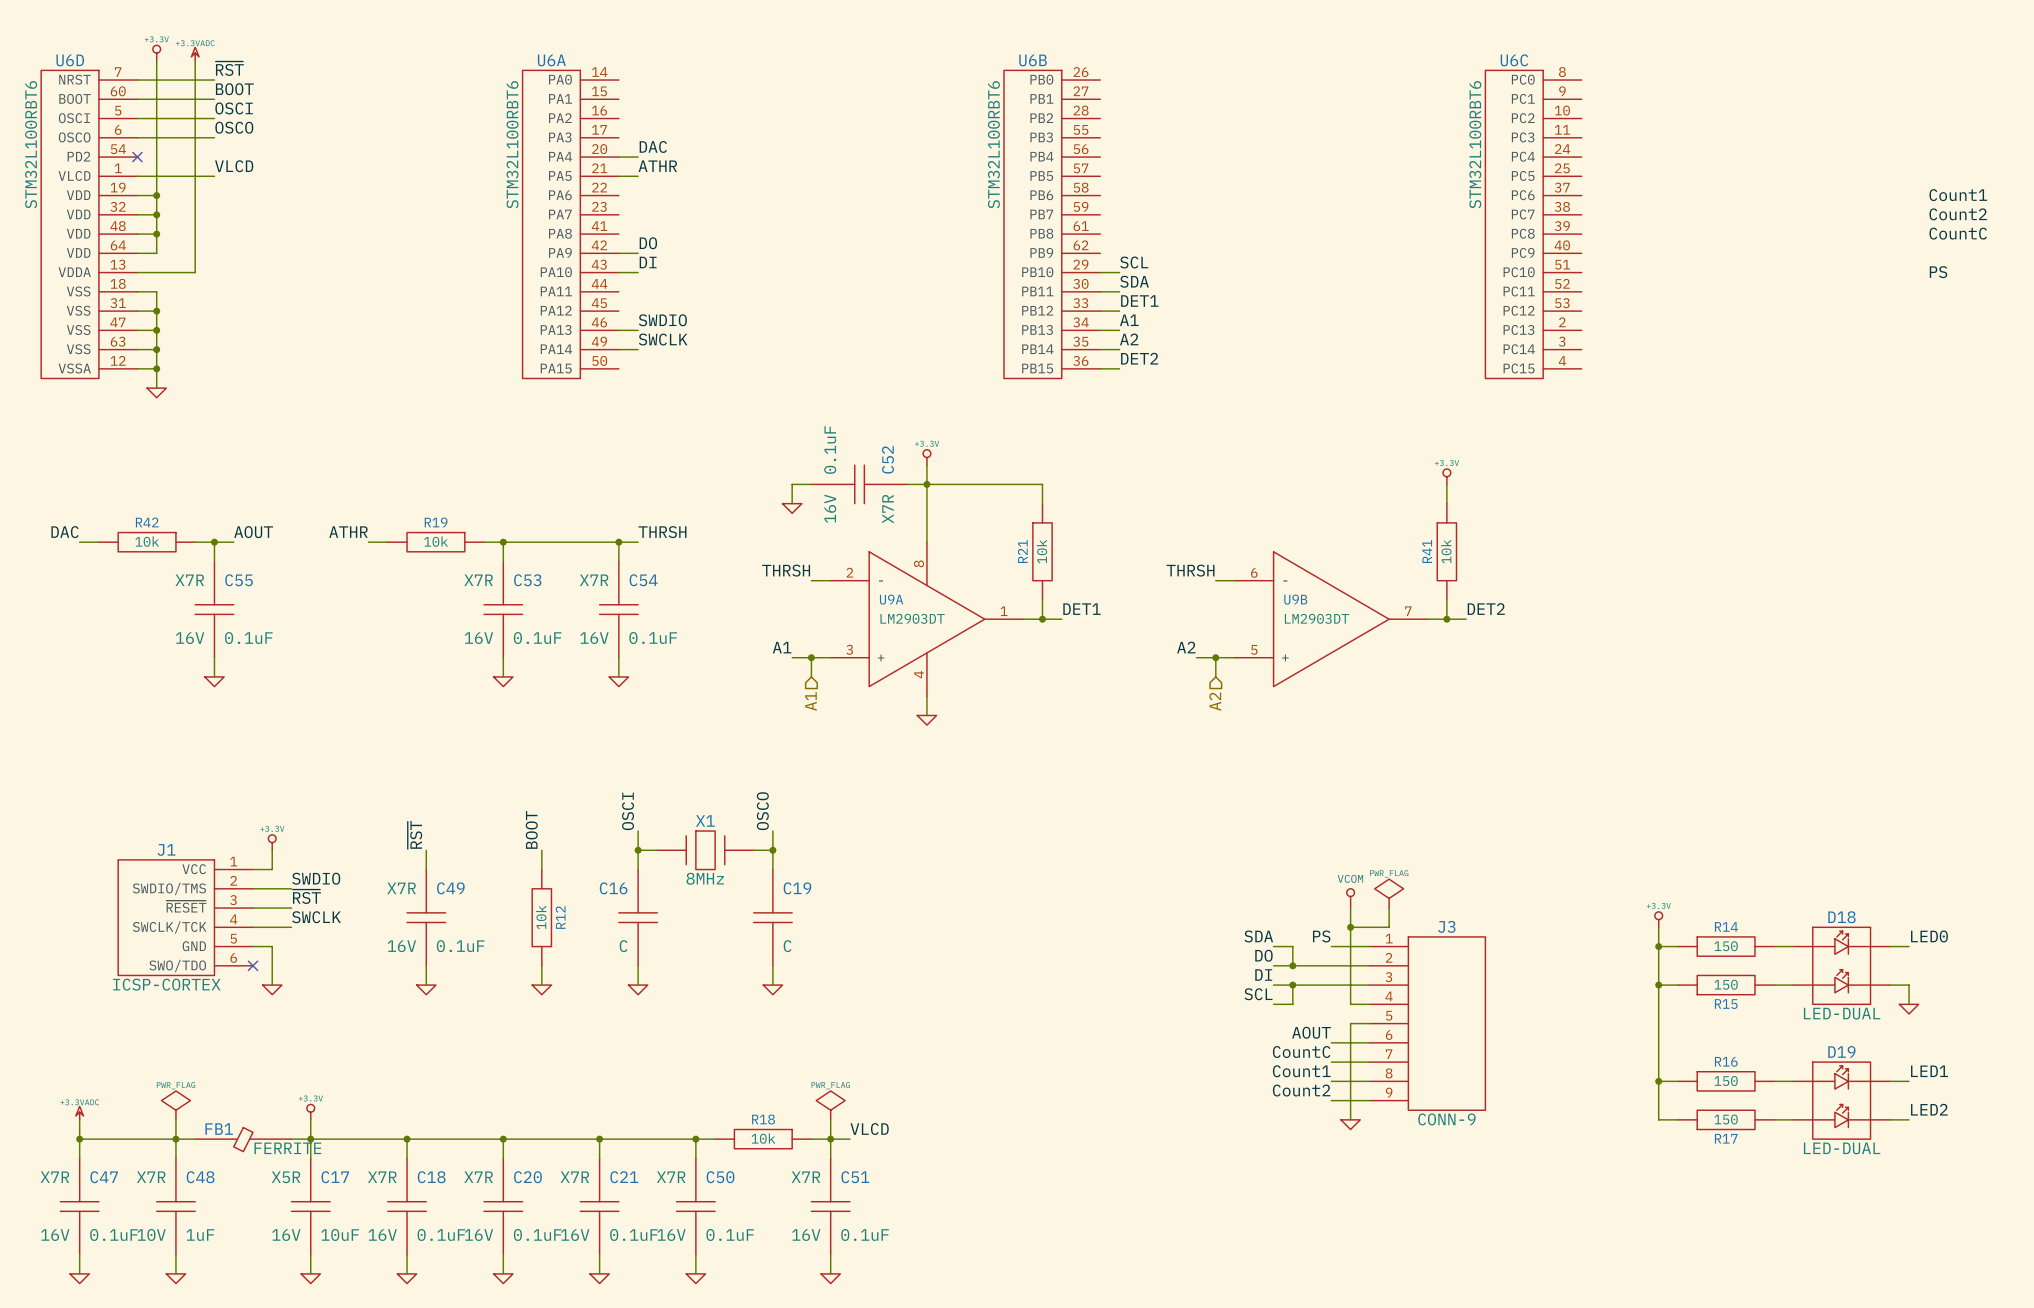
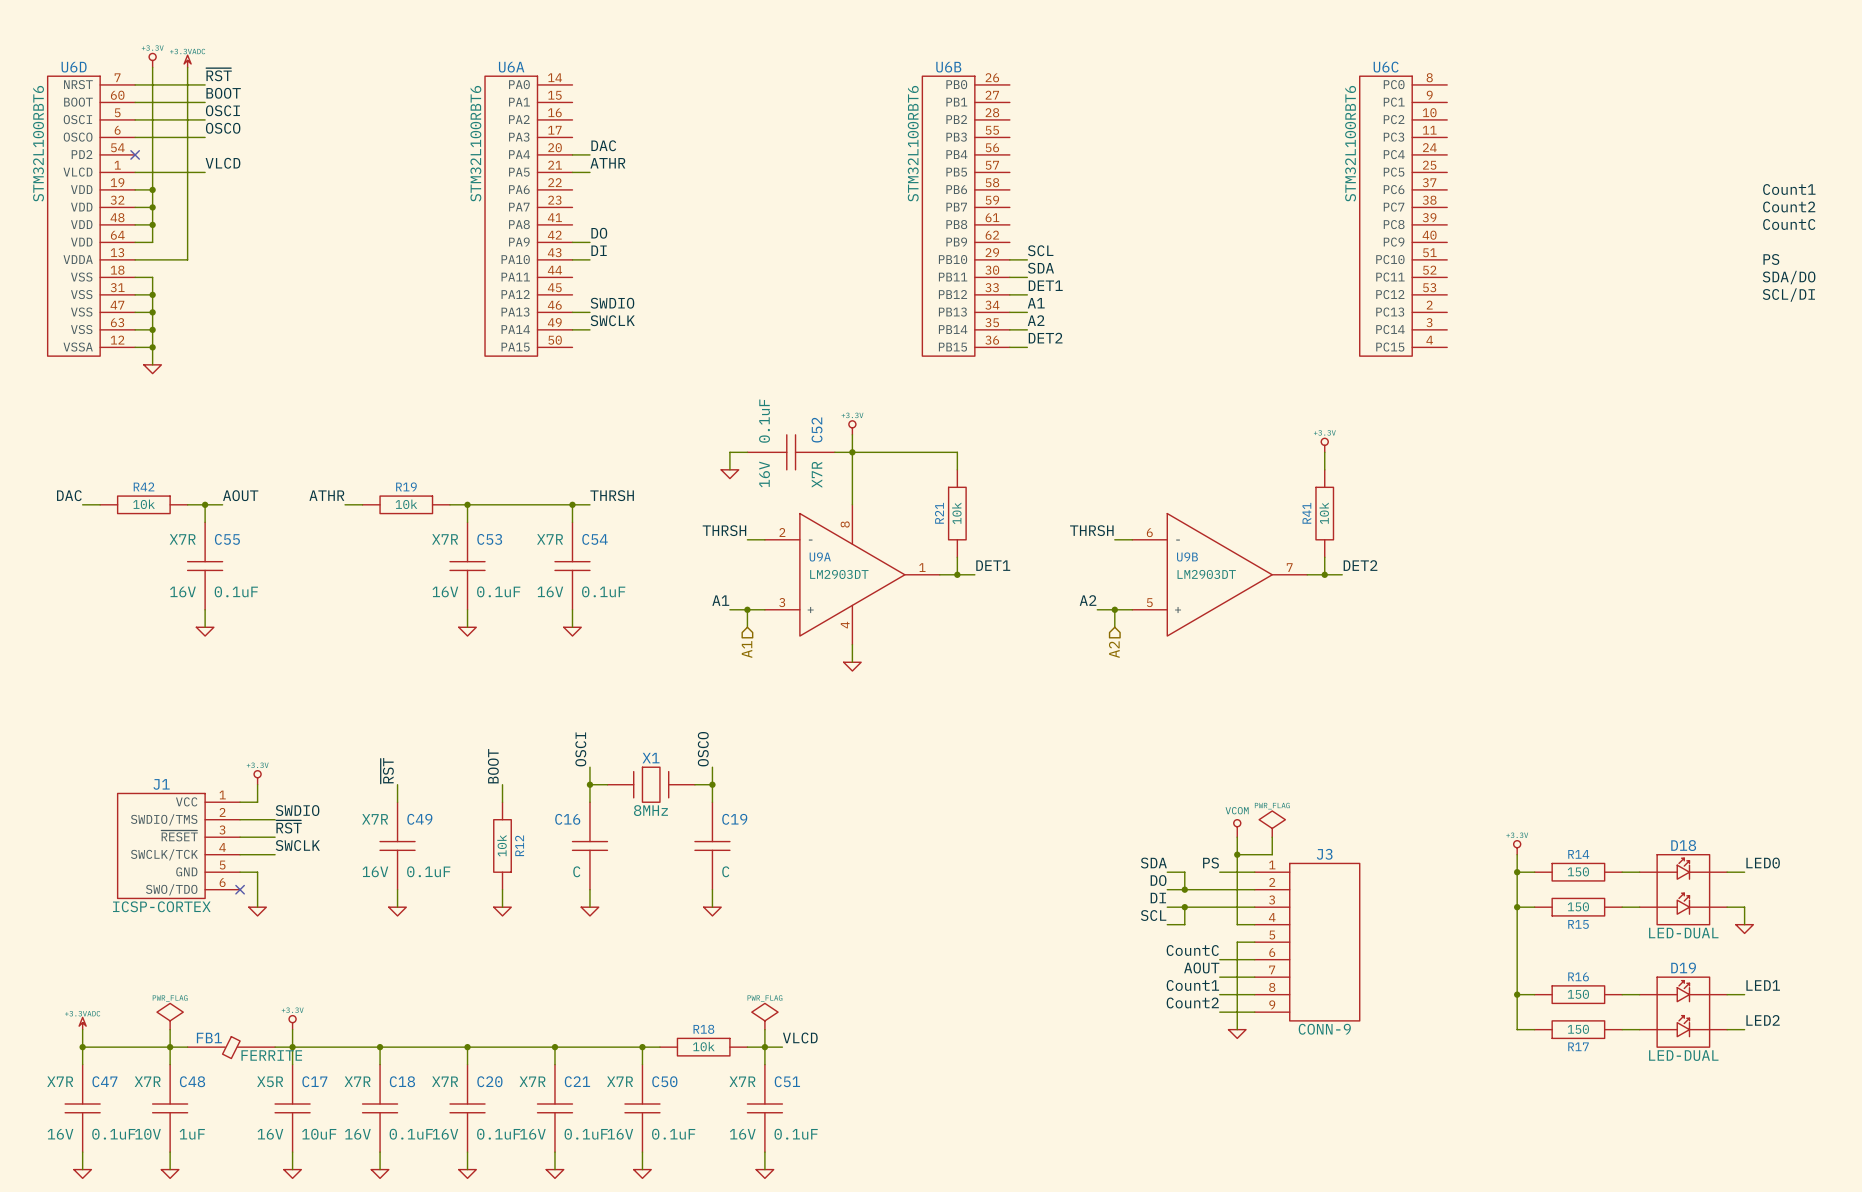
label: none -> SDA/DO (1789, 277)
label: none -> SCL/DI (1788, 295)
label: AOUT (1311, 1032) -> CountC (1192, 950)
label: CountC (1301, 1052) -> AOUT (1201, 968)

